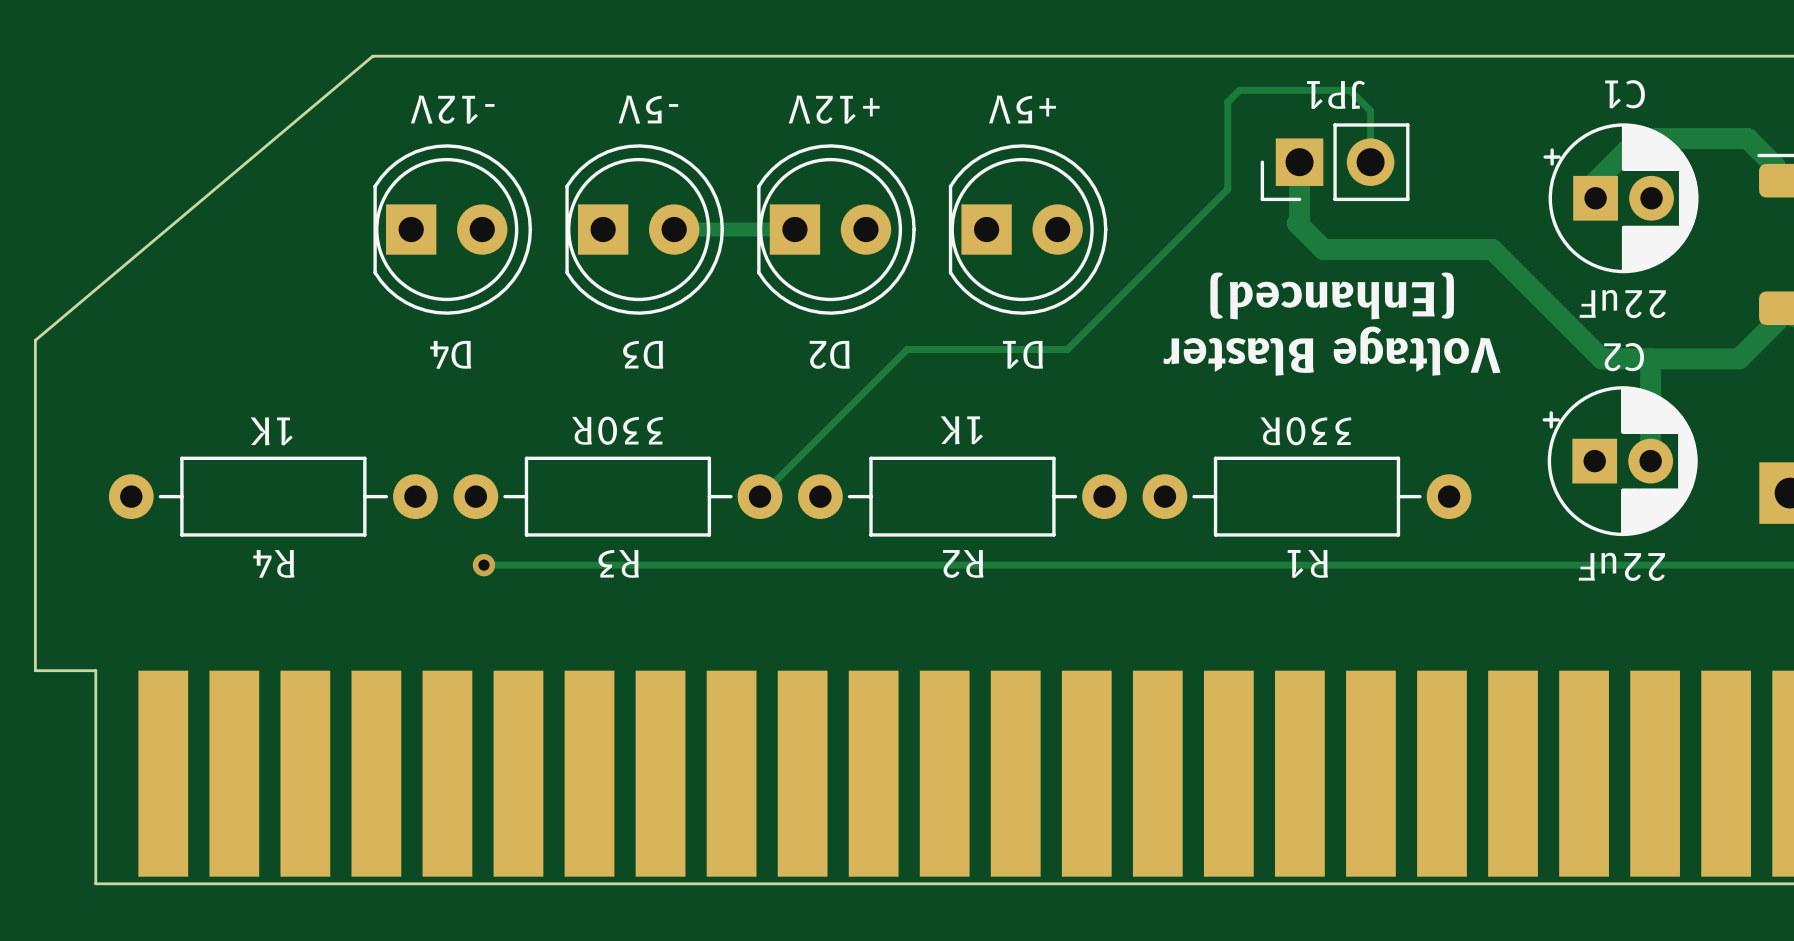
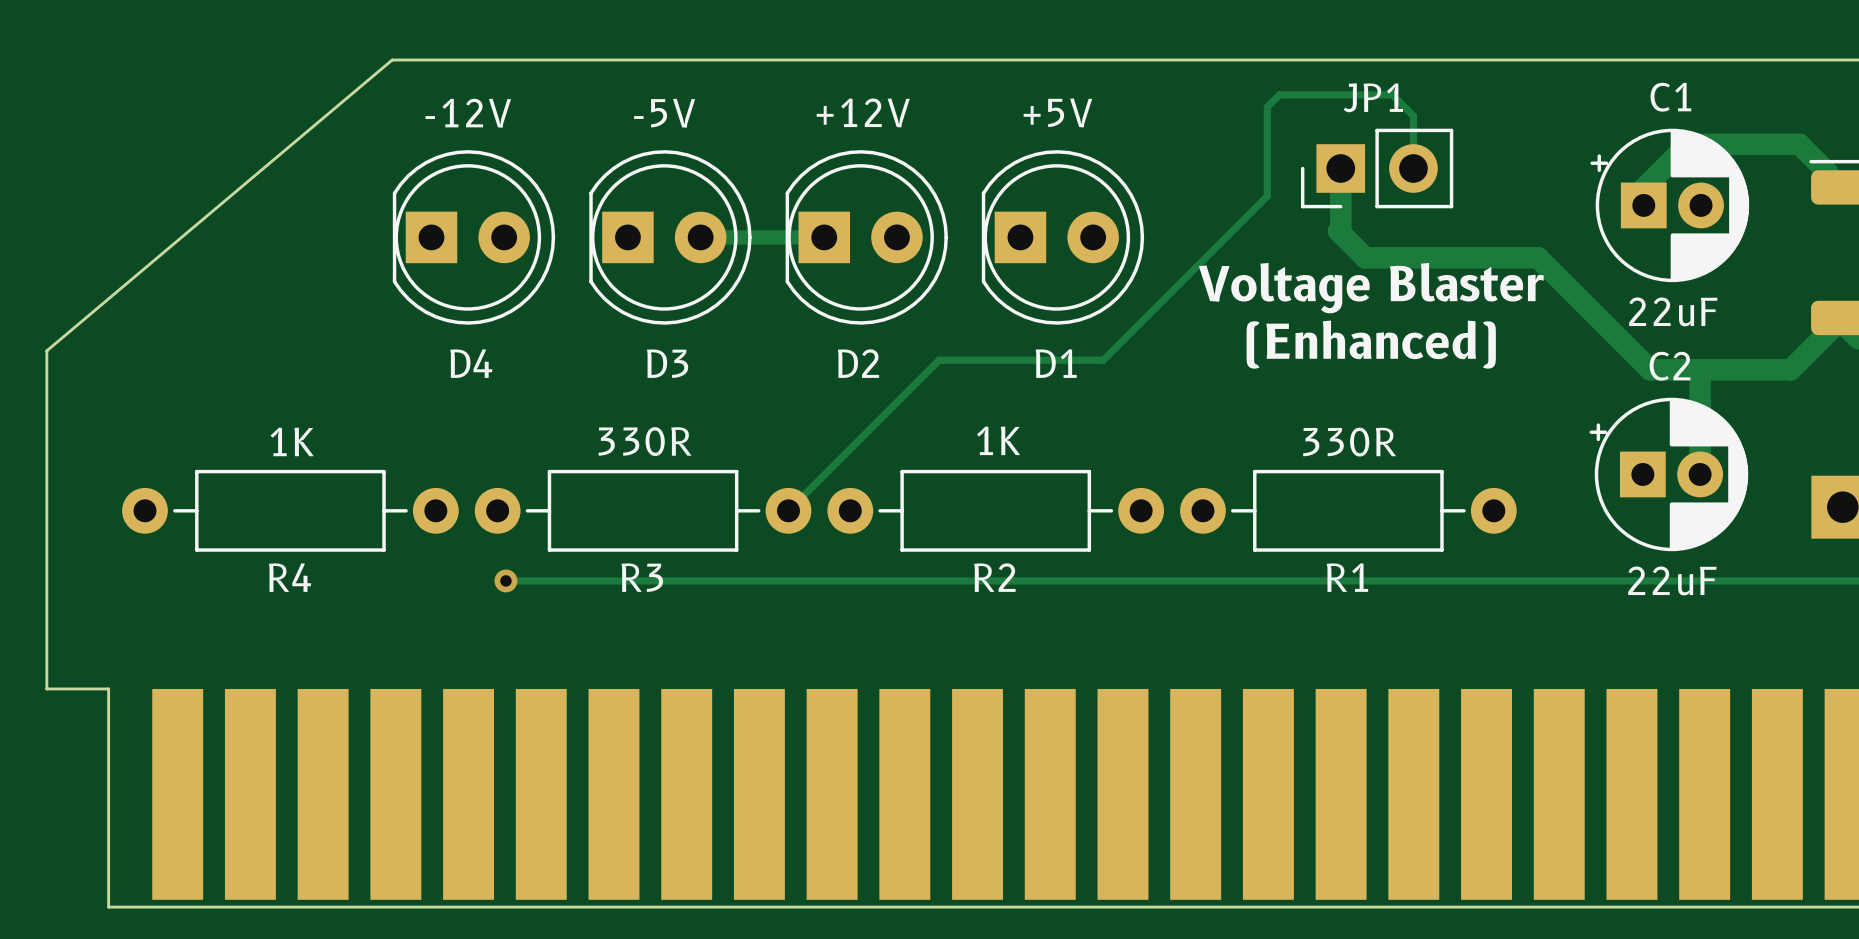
JP1 name rotation: 0° (1335, 94) -> 180° (1373, 97)
C1 name rotation: 0° (1625, 94) -> 180° (1670, 97)
D4 value rotation: 0° (452, 109) -> 180° (468, 113)
D3 value rotation: 0° (648, 109) -> 180° (664, 113)
D2 value rotation: 0° (834, 109) -> 180° (863, 112)
D1 value rotation: 0° (1022, 109) -> 180° (1057, 112)
text rotation: 0° (1332, 295) -> 180° (1371, 344)
C1 value rotation: 0° (1622, 304) -> 180° (1673, 311)
text rotation: 0° (1332, 351) -> 180° (1371, 288)
D4 name rotation: 0° (450, 354) -> 180° (471, 363)
D3 name rotation: 0° (643, 354) -> 180° (667, 363)
D2 name rotation: 0° (829, 354) -> 180° (858, 363)
D1 name rotation: 0° (1023, 354) -> 180° (1056, 363)
C2 name rotation: 0° (1624, 357) -> 180° (1670, 366)
R3 value rotation: 0° (617, 430) -> 180° (645, 441)
R2 value rotation: 0° (961, 430) -> 180° (998, 440)
R4 value rotation: 0° (271, 431) -> 180° (292, 441)
R1 value rotation: 0° (1305, 431) -> 180° (1349, 442)
R4 name rotation: 0° (273, 563) -> 180° (290, 577)
R3 name rotation: 0° (618, 563) -> 180° (642, 577)
R2 name rotation: 0° (963, 563) -> 180° (994, 577)
R1 name rotation: 0° (1307, 563) -> 180° (1347, 577)
C2 value rotation: 0° (1621, 566) -> 180° (1672, 580)

